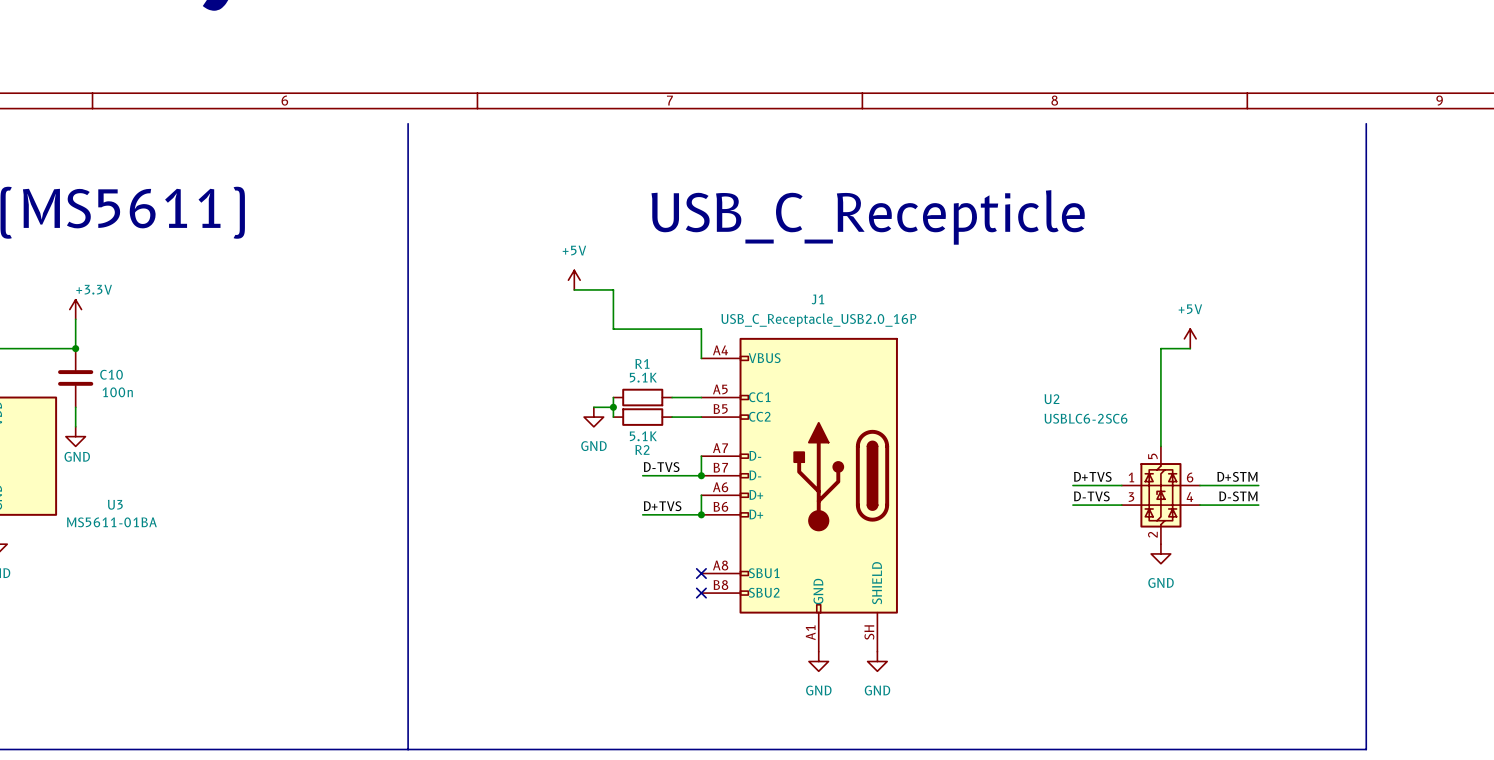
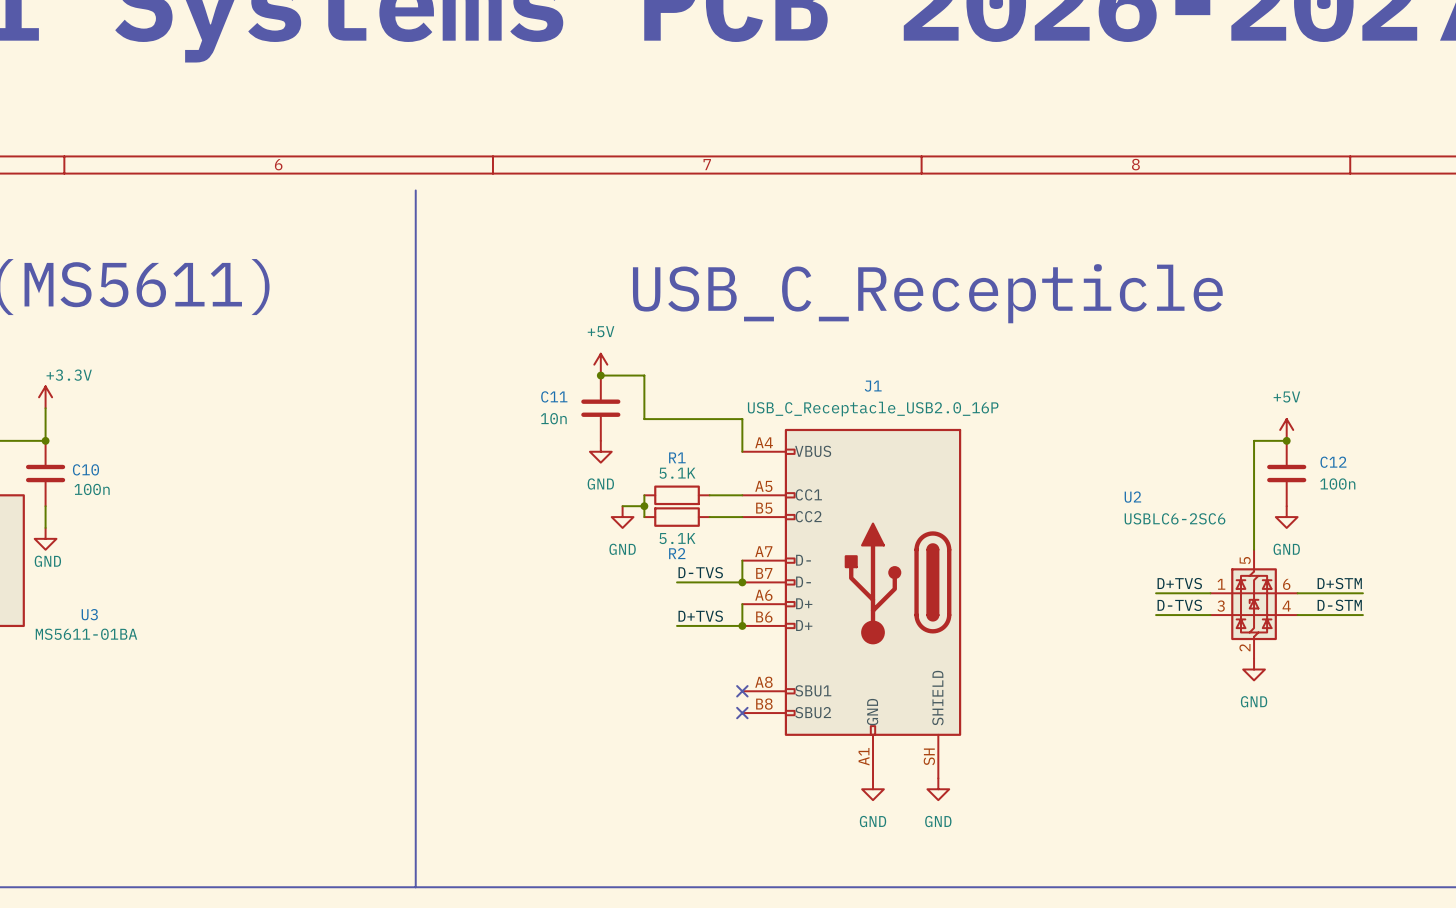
junction: none -> (600, 375)
C11: none -> 10n (600, 408)
junction: none -> (1286, 440)
power symbol: none -> GND (600, 451)
C12: none -> 100n (1286, 473)
power symbol: none -> GND (1286, 517)

